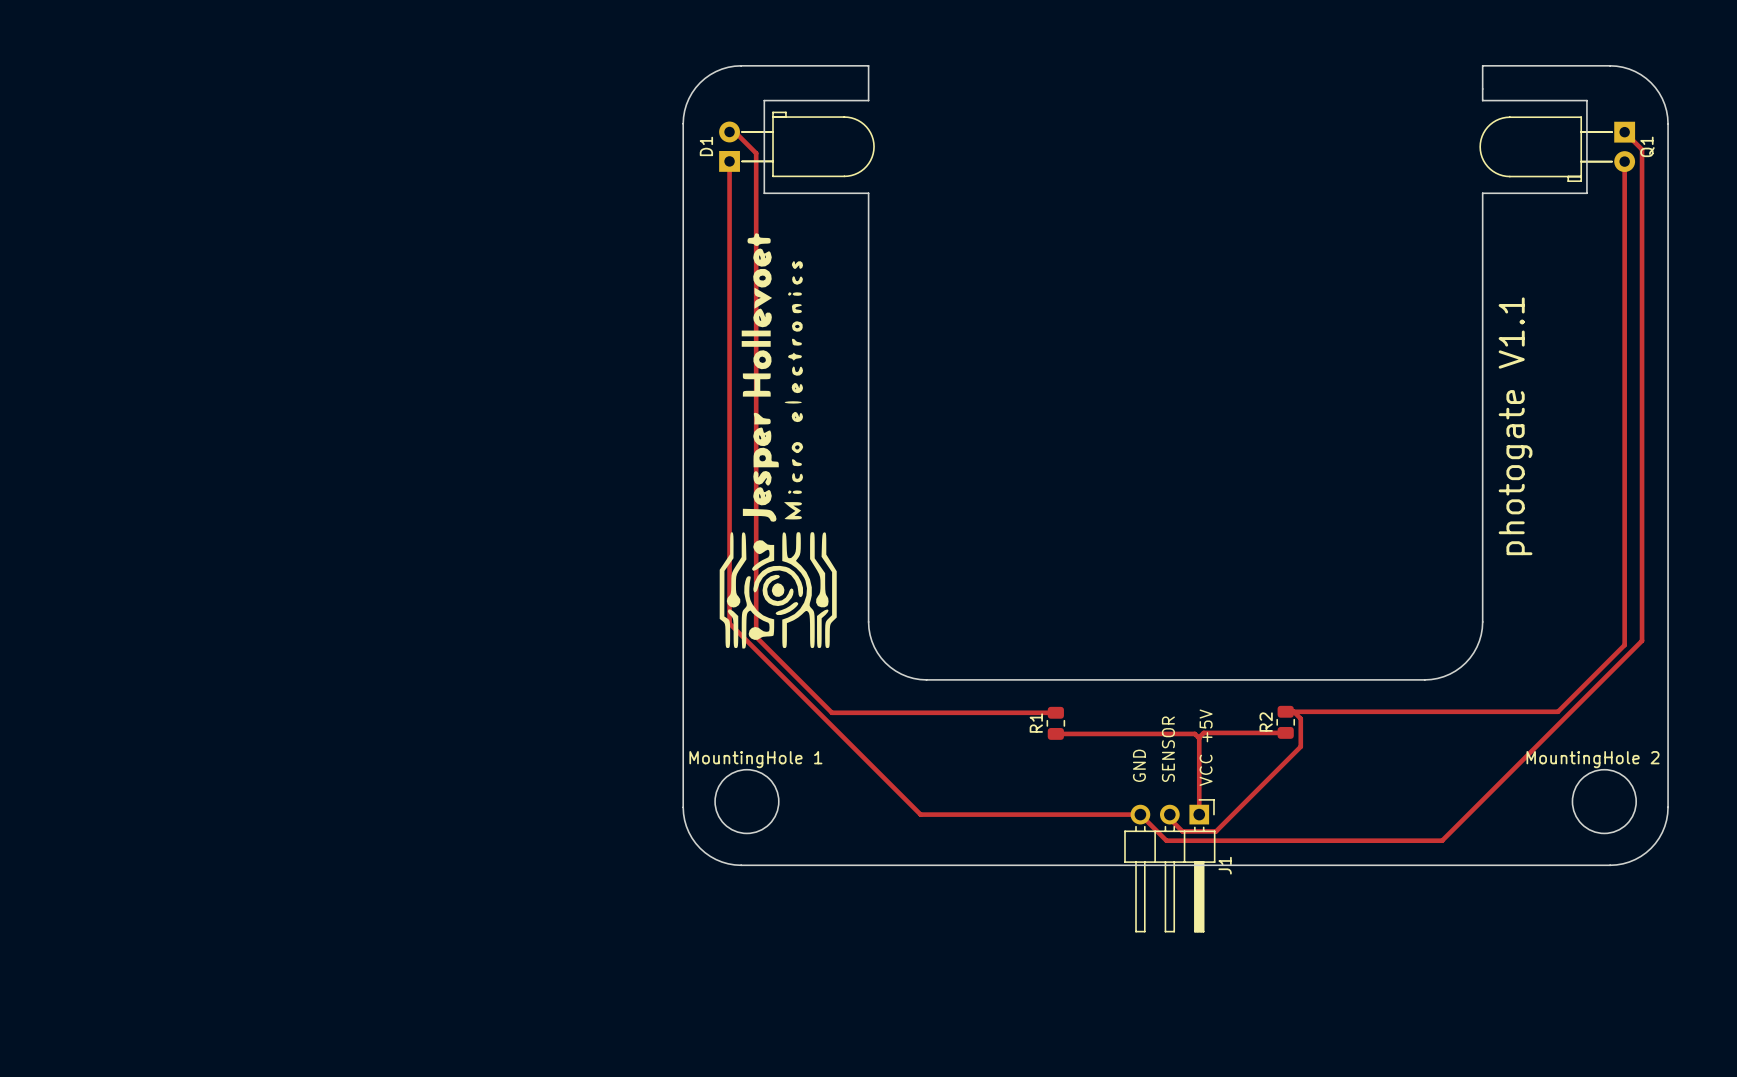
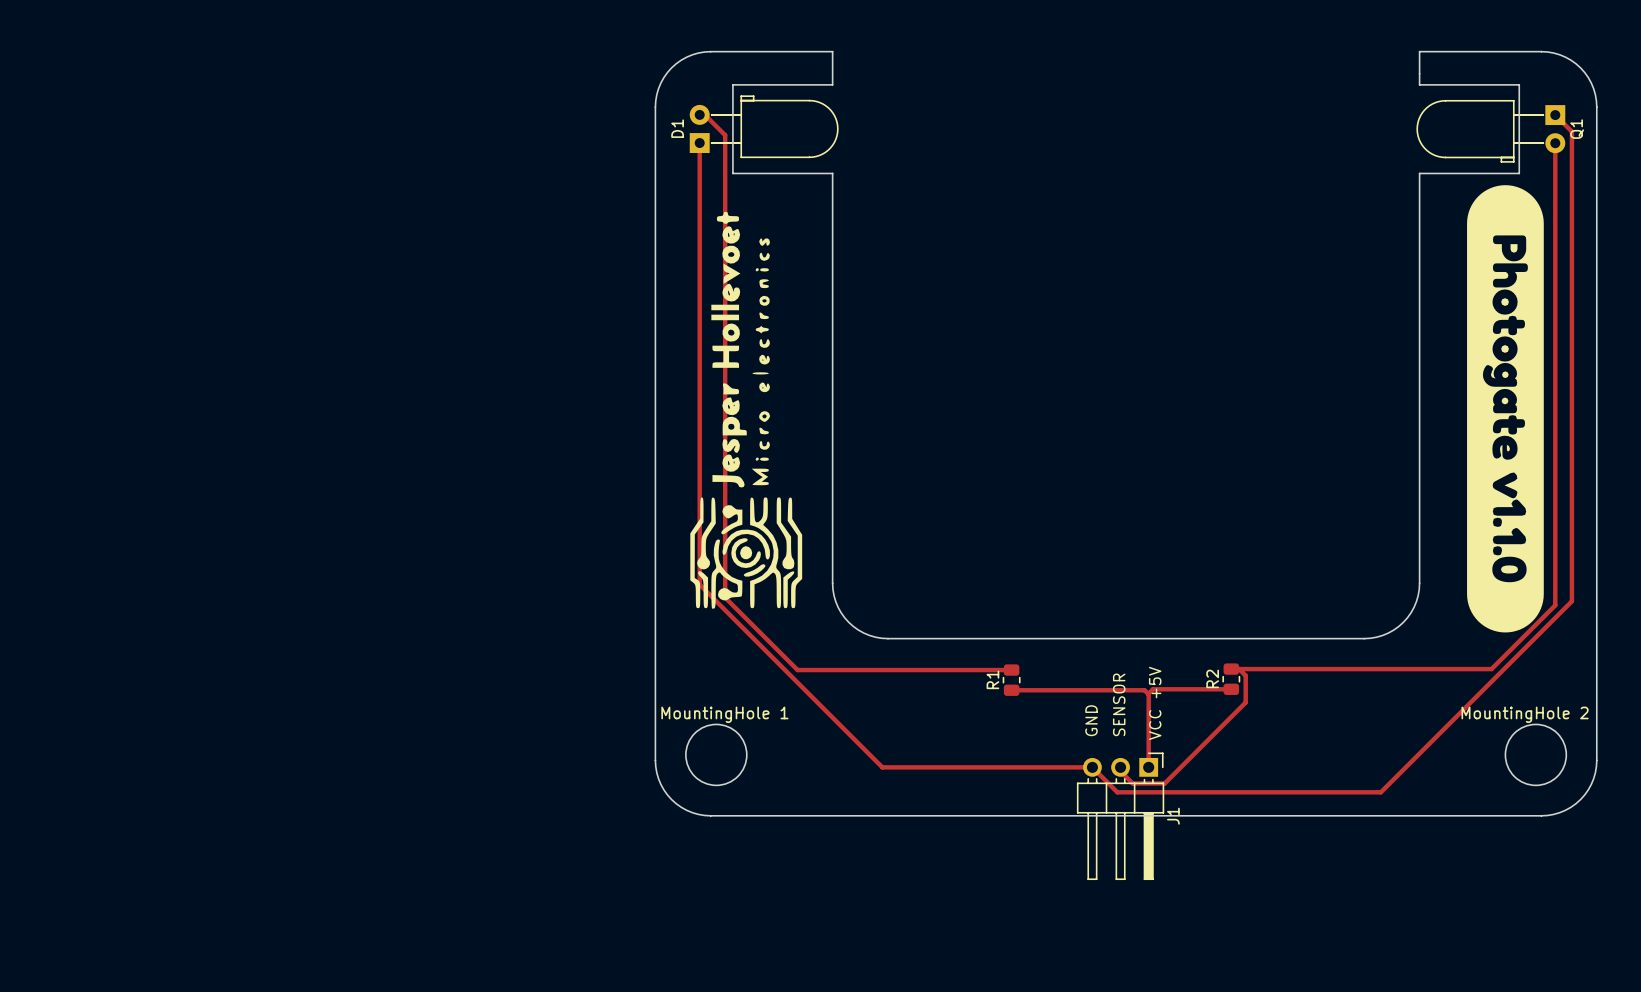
drawing: none -> [1467, 185, 1544, 633]
text: photogate V1.1 (1515, 426) -> none

